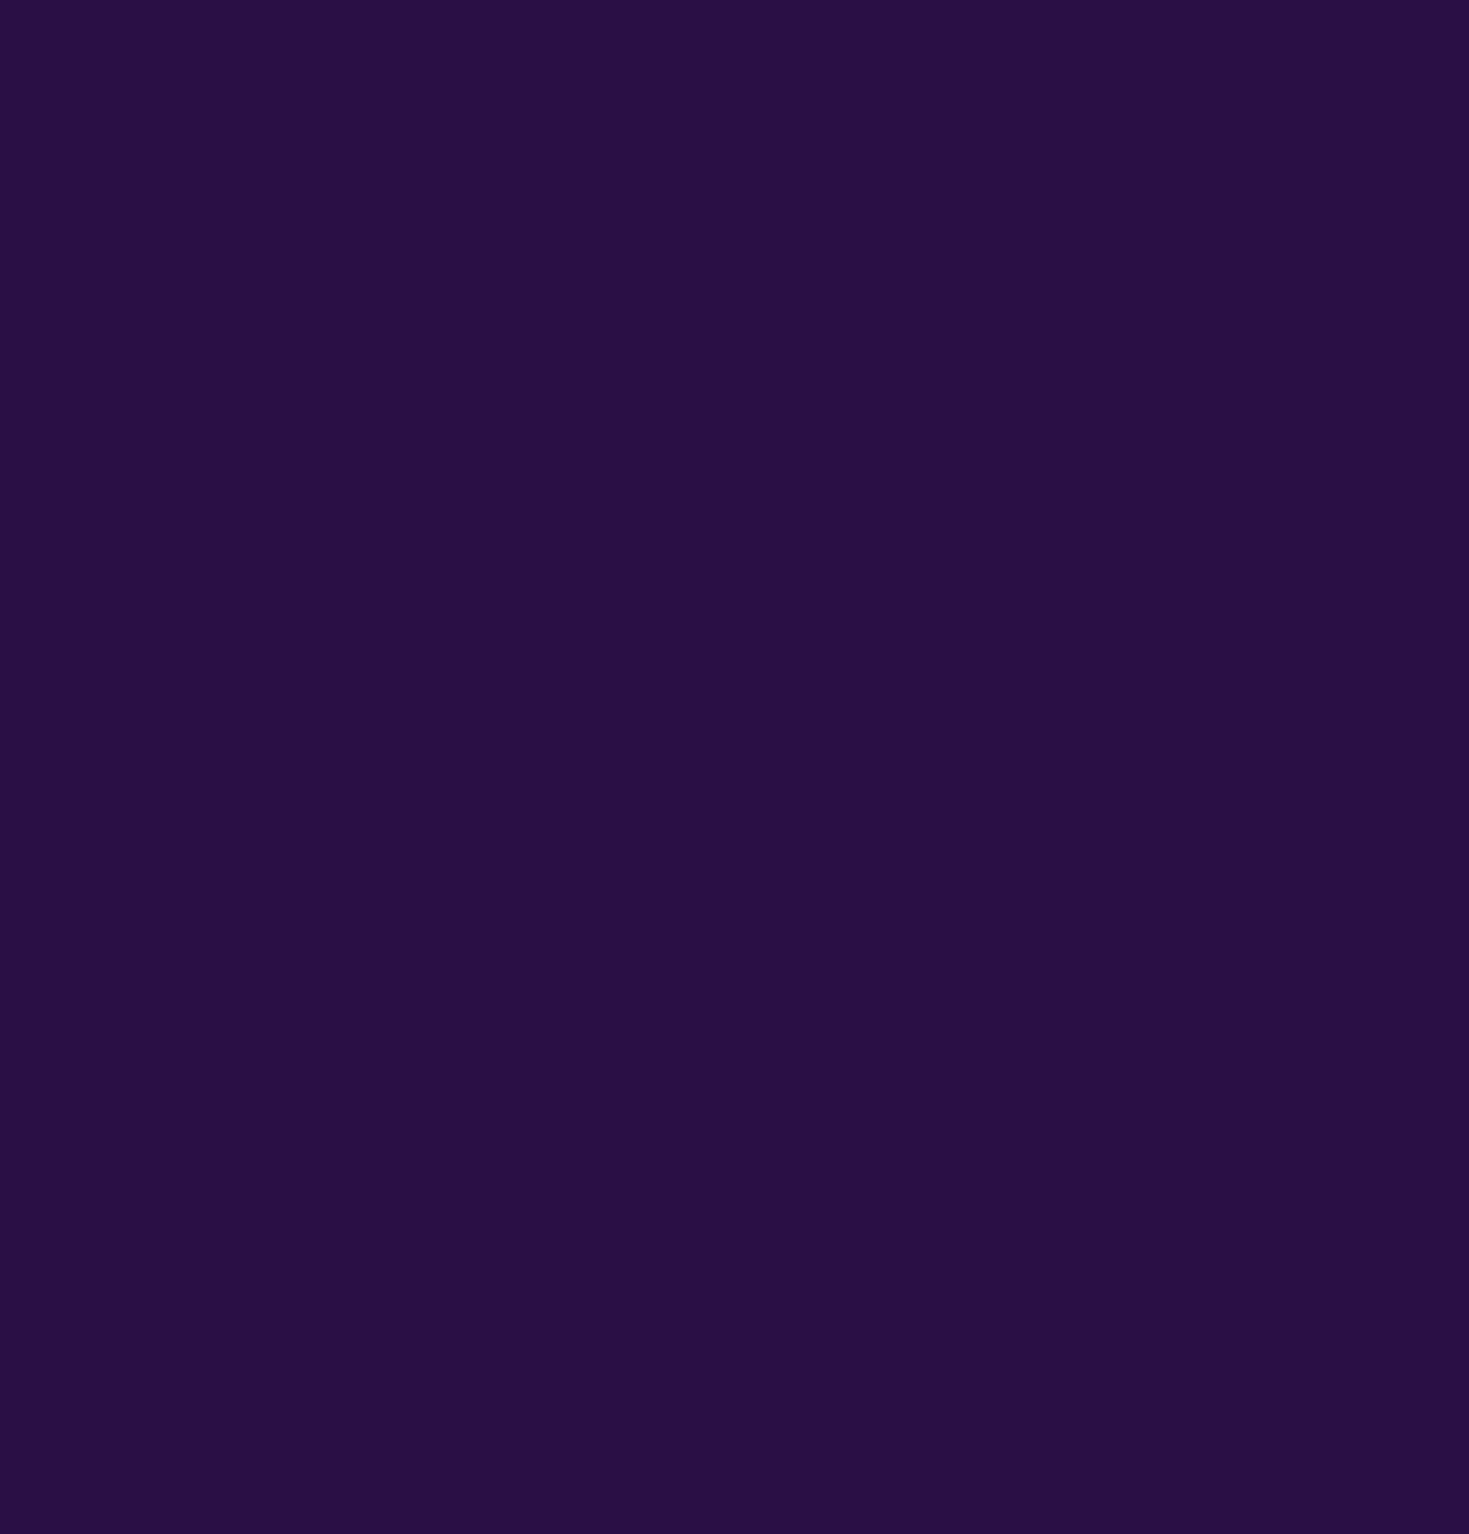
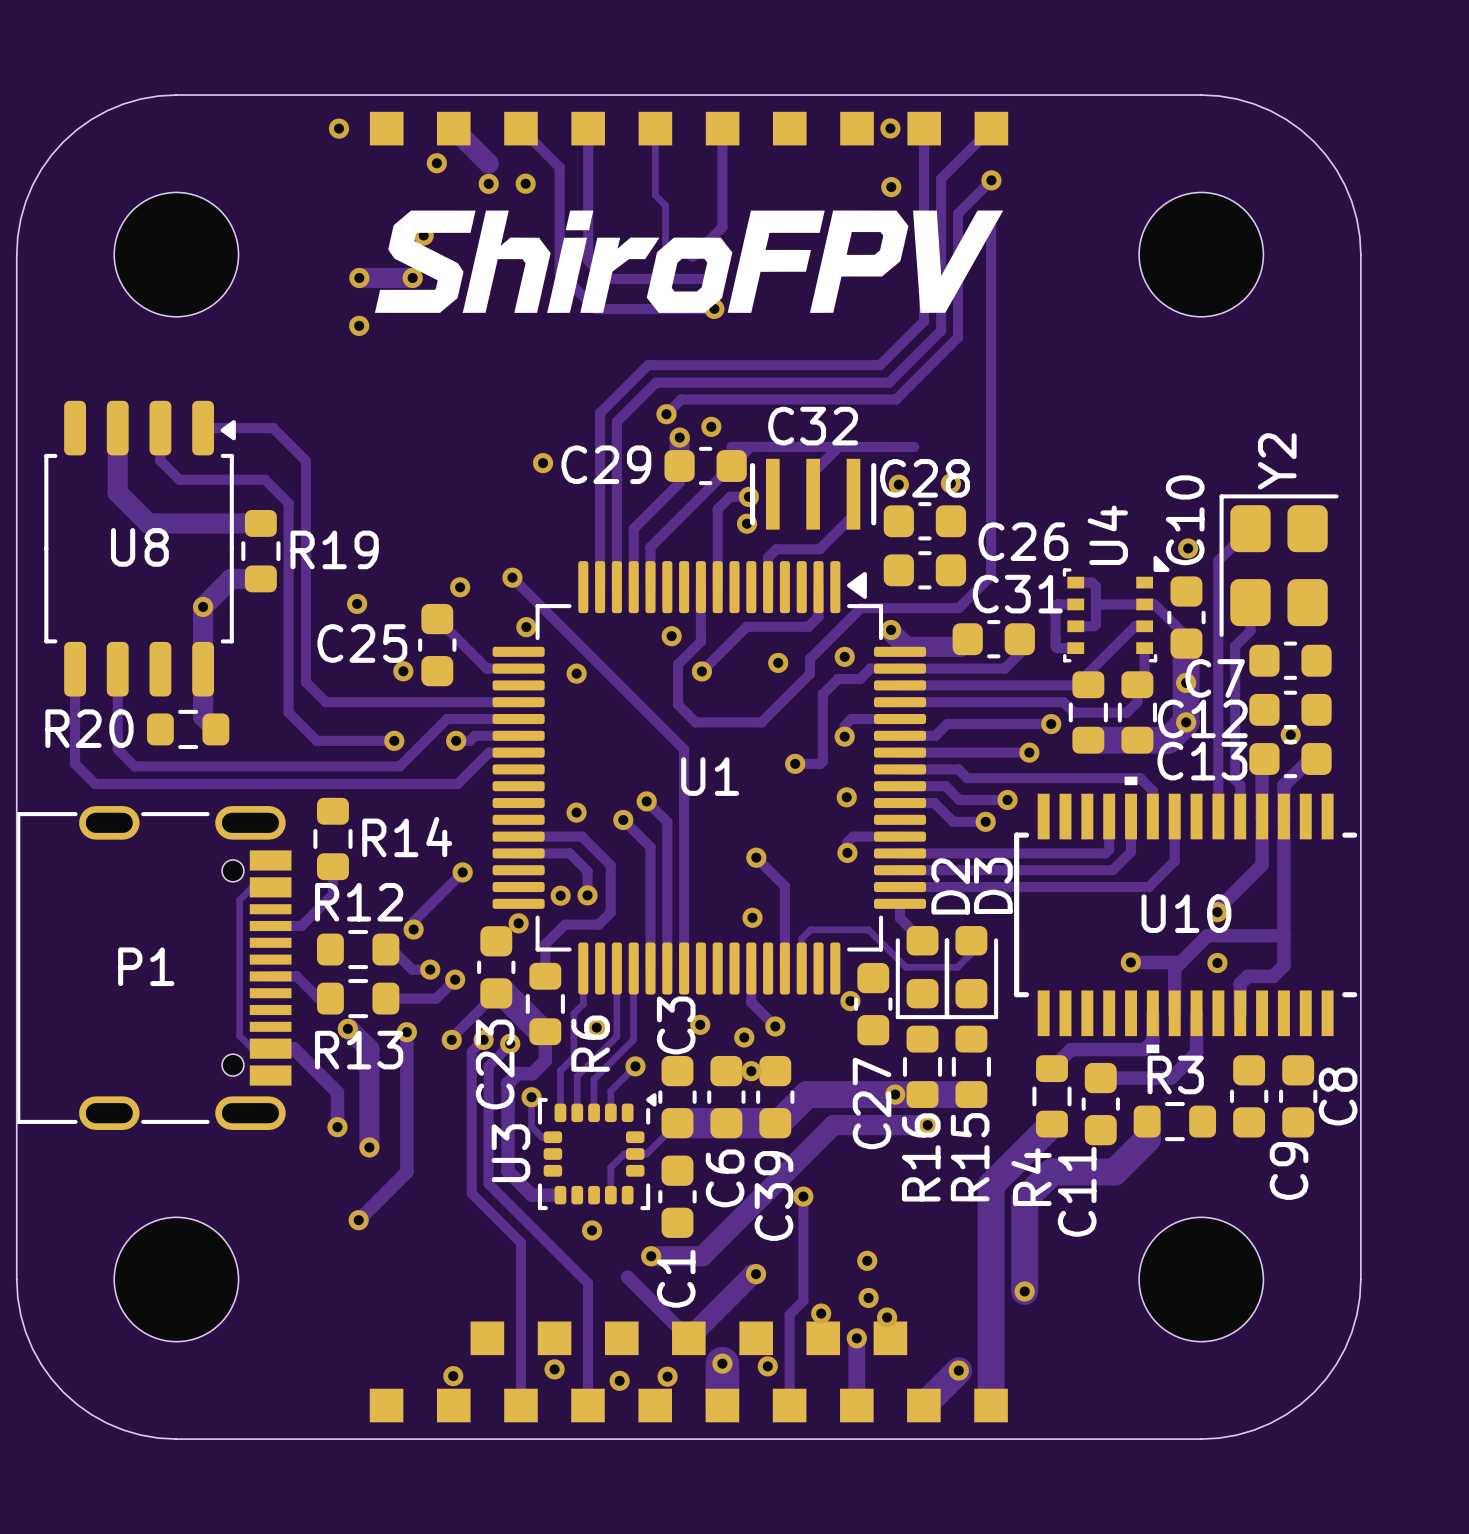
board edge: none -> (176, 95) (1201, 95) (1236, 99) (1270, 110) (1300, 129) (1326, 155) (1336, 169) (1351, 201) (1356, 219) (1360, 254) (1360, 1279) (1356, 1315) (1345, 1348) (1326, 1379) (1300, 1404) (1286, 1414) (1253, 1430) (1219, 1438) (1201, 1439) (176, 1439) (140, 1435) (107, 1423) (76, 1404) (51, 1379) (32, 1348) (25, 1332) (20, 1315) (16, 1279) (17, 236) (25, 201) (32, 185) (51, 155) (63, 141) (91, 119) (107, 110) (140, 99) (176, 95)
via: none -> (339, 128)
part: none -> (386, 128)
track: none -> (453, 128) (488, 163)
part: none -> (453, 128)
track: none -> (520, 128) (559, 167) (559, 272) (595, 309) (714, 309)
part: none -> (520, 128)
track: none -> (588, 128) (588, 260) (606, 278) (714, 278)
part: none -> (588, 128)
track: none -> (655, 128) (655, 195) (665, 205) (665, 256)
part: none -> (655, 128)
track: none -> (722, 128) (722, 227) (692, 257)
part: none -> (722, 128)
part: none -> (789, 128)
part: none -> (856, 128)
via: none -> (890, 128)
track: none -> (924, 128) (924, 321) (880, 365) (647, 365) (600, 413) (600, 587)
part: none -> (924, 128)
track: none -> (991, 128) (941, 178) (941, 330) (889, 382) (656, 382) (616, 421) (616, 587)
part: none -> (991, 128)
via: none -> (436, 163)
track: none -> (991, 180) (958, 213) (958, 337) (896, 399) (681, 399) (666, 414)
via: none -> (991, 180)
via: none -> (488, 183)
via: none -> (525, 183)
via: none -> (891, 187)
drawing: none -> [374, 210, 1004, 313]
track: none -> (991, 223) (991, 575) (958, 608) (860, 608) (809, 659) (809, 673) (761, 722) (695, 722) (678, 704) (678, 664) (700, 641) (700, 587)
via: none -> (423, 235)
part: none -> (176, 254)
part: none -> (1201, 254)
track: none -> (359, 277) (412, 277)
via: none -> (359, 277)
via: none -> (412, 277)
via: none -> (714, 308)
via: none -> (359, 325)
via: none -> (666, 414)
via: none -> (711, 426)
track: none -> (117, 428) (117, 492) (148, 523) (260, 523)
track: none -> (160, 428) (160, 460) (179, 479) (265, 479) (288, 503) (288, 712) (316, 740) (394, 740)
track: none -> (203, 428) (273, 428) (305, 460) (305, 682) (326, 702) (518, 702)
track: none -> (679, 437) (679, 482) (633, 528) (633, 587)
via: none -> (679, 437)
track: none -> (731, 446) (914, 447)
track: none -> (750, 446) (650, 547) (650, 587)
track: none -> (838, 447) (813, 472)
via: none -> (543, 463)
C29: none -> (705, 465)
via: none -> (950, 483)
via: none -> (898, 484)
C32: none -> (813, 494)
track: none -> (853, 494) (853, 515) (819, 549) (776, 549) (768, 557) (768, 587)
track: none -> (748, 496) (730, 496) (717, 509) (717, 587)
via: none -> (748, 496)
C28: none -> (924, 521)
via: none -> (747, 523)
track: none -> (1250, 528) (1218, 560) (1218, 816)
U8: none -> (140, 548)
via: none -> (1188, 548)
R19: none -> (260, 551)
Y2: none -> (1279, 565)
C26: none -> (924, 570)
track: none -> (512, 577) (684, 749) (684, 968)
via: none -> (512, 577)
track: none -> (260, 578) (231, 578) (203, 606) (203, 716) (215, 729)
track: none -> (1075, 582) (1091, 582) (1095, 586) (1095, 624) (1094, 626) (1075, 626)
via: none -> (460, 587)
track: none -> (818, 587) (818, 616) (808, 626) (746, 626) (701, 671)
track: none -> (1250, 602) (1250, 630) (1235, 646) (1235, 779) (1240, 785) (1240, 816)
via: none -> (357, 603)
track: none -> (1075, 604) (1057, 604) (1055, 606) (1055, 646) (1057, 648) (1075, 648)
track: none -> (1096, 604) (1154, 604) (1186, 636) (1186, 722) (1168, 740) (1088, 740)
via: none -> (203, 606)
U4: none -> (1116, 609)
C10: none -> (1186, 617)
track: none -> (437, 619) (486, 668) (518, 668)
track: none -> (1144, 626) (1135, 626) (1088, 673) (1087, 685) (900, 685)
via: none -> (526, 627)
via: none -> (891, 629)
track: none -> (891, 631) (905, 646) (960, 646) (967, 639)
via: none -> (671, 636)
C31: none -> (993, 639)
track: none -> (1019, 639) (1019, 653) (1004, 668) (870, 668) (860, 679) (838, 679) (822, 694) (822, 761) (820, 763) (795, 763)
C25: none -> (437, 645)
track: none -> (1144, 648) (1144, 677) (1137, 684) (1137, 702) (1126, 712) (1073, 712) (1063, 702) (900, 702)
via: none -> (844, 656)
C7: none -> (1290, 660)
via: none -> (778, 662)
track: none -> (75, 669) (75, 763) (95, 784) (457, 784) (489, 752) (518, 752)
track: none -> (117, 669) (117, 749) (134, 766) (399, 766) (447, 719) (518, 719)
via: none -> (403, 671)
via: none -> (701, 671)
via: none -> (576, 673)
via: none -> (1186, 682)
C12: none -> (1290, 709)
part: none -> (1088, 712)
part: none -> (1137, 712)
track: none -> (900, 719) (851, 719) (844, 725) (844, 736)
via: none -> (1186, 722)
track: none -> (1051, 724) (947, 724) (935, 735) (900, 735)
via: none -> (1051, 724)
R20: none -> (188, 729)
via: none -> (1290, 734)
track: none -> (518, 735) (474, 735) (469, 740) (456, 740)
via: none -> (844, 736)
via: none -> (394, 740)
via: none -> (456, 740)
track: none -> (900, 752) (1029, 752)
via: none -> (1029, 752)
track: none -> (1264, 759) (1262, 761) (1262, 865) (1217, 909) (1217, 912)
C13: none -> (1290, 759)
track: none -> (1310, 759) (1283, 785) (1283, 965) (1273, 976) (1247, 976) (1240, 983) (1240, 1013)
via: none -> (795, 763)
track: none -> (900, 769) (958, 769) (967, 778) (1140, 778) (1152, 790) (1152, 816)
U1: none -> (709, 777)
track: none -> (900, 786) (945, 786) (959, 800) (1007, 800)
via: none -> (846, 797)
via: none -> (1007, 800)
track: none -> (646, 801) (667, 822) (667, 968)
via: none -> (646, 801)
track: none -> (900, 803) (934, 803) (953, 821) (985, 821)
via: none -> (576, 812)
track: none -> (1109, 816) (1109, 849) (1105, 853) (900, 853)
track: none -> (1131, 816) (1131, 851) (1112, 870) (900, 870)
track: none -> (1174, 816) (1174, 861) (1148, 887) (900, 887)
track: none -> (623, 819) (650, 847) (650, 968)
via: none -> (623, 819)
via: none -> (985, 821)
track: none -> (518, 836) (581, 836) (610, 865) (610, 912) (598, 924) (564, 924) (545, 944) (545, 976)
track: none -> (900, 836) (852, 836) (847, 842) (847, 853)
R14: none -> (332, 838)
via: none -> (847, 852)
track: none -> (518, 853) (569, 853) (587, 871) (587, 895)
track: none -> (756, 857) (784, 886) (784, 968)
via: none -> (756, 857)
track: none -> (332, 866) (332, 894) (301, 926) (270, 926)
track: none -> (462, 872) (413, 921) (413, 929)
via: none -> (462, 872)
track: none -> (270, 887) (252, 887) (239, 900) (239, 1036) (252, 1048) (293, 1048) (337, 1092) (337, 1127)
via: none -> (560, 895)
via: none -> (587, 895)
track: none -> (900, 903) (900, 918) (922, 940)
via: none -> (1217, 912)
U10: none -> (1185, 914)
via: none -> (752, 917)
via: none -> (518, 923)
via: none -> (413, 929)
track: none -> (1283, 935) (1207, 935) (1174, 968) (1174, 1013)
track: none -> (971, 940) (971, 953) (957, 967) (906, 967) (868, 929) (810, 929) (801, 938) (801, 968)
track: none -> (381, 945) (385, 949) (391, 948) (412, 969) (430, 969)
R12: none -> (358, 949)
track: none -> (1130, 962) (1180, 962)
via: none -> (1130, 962)
via: none -> (1217, 962)
C23: none -> (496, 967)
P1: none -> (153, 968)
track: none -> (583, 968) (583, 1004) (573, 1013) (573, 1057) (560, 1070) (560, 1112)
track: none -> (616, 968) (616, 1036) (577, 1076) (577, 1112)
track: none -> (633, 968) (633, 1039) (594, 1079) (594, 1112)
track: none -> (751, 968) (751, 1002) (775, 1026)
via: none -> (430, 969)
D2: none -> (922, 972)
D3: none -> (971, 972)
track: none -> (270, 976) (296, 976) (318, 998) (330, 998)
track: none -> (455, 979) (436, 998) (385, 998) (384, 1007)
via: none -> (455, 979)
part: none -> (358, 998)
via: none -> (850, 1001)
R6: none -> (545, 1003)
C27: none -> (873, 1004)
track: none -> (1152, 1013) (1152, 1041) (1144, 1049) (1071, 1049) (1051, 1068)
track: none -> (1196, 1013) (1196, 1052) (1171, 1078) (1100, 1078)
via: none -> (700, 1024)
via: none -> (775, 1026)
via: none -> (596, 1027)
track: none -> (347, 1028) (369, 1049) (369, 1147)
via: none -> (347, 1028)
track: none -> (406, 1032) (406, 1172) (358, 1220)
via: none -> (406, 1032)
via: none -> (744, 1037)
track: none -> (451, 1039) (496, 993) (503, 993) (541, 1031) (545, 1031) (545, 1060) (532, 1073) (517, 1073) (508, 1083) (508, 1171) (531, 1195) (552, 1195)
via: none -> (451, 1039)
track: none -> (483, 1039) (471, 1051) (471, 1193) (520, 1242) (520, 1405)
via: none -> (483, 1039)
track: none -> (510, 1043) (488, 1066) (488, 1183) (588, 1283) (588, 1405)
via: none -> (510, 1043)
text: none -> R13 (359, 1050)
track: none -> (635, 1066) (610, 1090) (610, 1112)
via: none -> (635, 1066)
R16: none -> (922, 1066)
R15: none -> (971, 1066)
via: none -> (751, 1071)
via: none -> (895, 1094)
track: none -> (971, 1094) (807, 1094) (778, 1123) (677, 1123) (646, 1154) (624, 1154) (610, 1167) (610, 1195)
R4: none -> (1051, 1096)
C9: none -> (1249, 1096)
C8: none -> (1298, 1096)
track: none -> (531, 1097) (531, 1126) (541, 1137) (552, 1137)
via: none -> (531, 1097)
C3: none -> (677, 1097)
C6: none -> (726, 1097)
C39: none -> (775, 1097)
C11: none -> (1100, 1104)
track: none -> (1147, 1121) (1147, 1139) (1114, 1171) (1052, 1171) (1024, 1199) (1024, 1291)
R3: none -> (1174, 1121)
track: none -> (1051, 1124) (991, 1185) (991, 1405)
track: none -> (927, 1125) (833, 1125) (702, 1256) (651, 1256)
via: none -> (927, 1125)
via: none -> (337, 1127)
via: none -> (369, 1147)
U3: none -> (597, 1151)
C1: none -> (677, 1196)
track: none -> (803, 1196) (803, 1300) (789, 1314) (789, 1405)
via: none -> (803, 1196)
via: none -> (358, 1220)
via: none -> (592, 1230)
via: none -> (651, 1256)
via: none -> (867, 1260)
track: none -> (756, 1274) (752, 1274) (688, 1338) (627, 1277)
via: none -> (756, 1274)
part: none -> (176, 1279)
part: none -> (1201, 1279)
via: none -> (1024, 1291)
via: none -> (868, 1297)
via: none -> (821, 1313)
via: none -> (887, 1317)
part: none -> (487, 1338)
part: none -> (554, 1338)
part: none -> (621, 1338)
part: none -> (688, 1338)
part: none -> (756, 1338)
part: none -> (823, 1338)
track: none -> (856, 1338) (856, 1405)
via: none -> (856, 1338)
part: none -> (890, 1338)
track: none -> (722, 1363) (722, 1405)
via: none -> (722, 1363)
via: none -> (767, 1366)
via: none -> (554, 1369)
track: none -> (958, 1370) (923, 1405)
via: none -> (958, 1370)
via: none -> (453, 1376)
via: none -> (667, 1376)
via: none -> (619, 1380)
part: none -> (386, 1405)
part: none -> (453, 1405)
part: none -> (520, 1405)
part: none -> (588, 1405)
part: none -> (655, 1405)
part: none -> (722, 1405)
part: none -> (789, 1405)
part: none -> (856, 1405)
part: none -> (923, 1405)
part: none -> (991, 1405)

